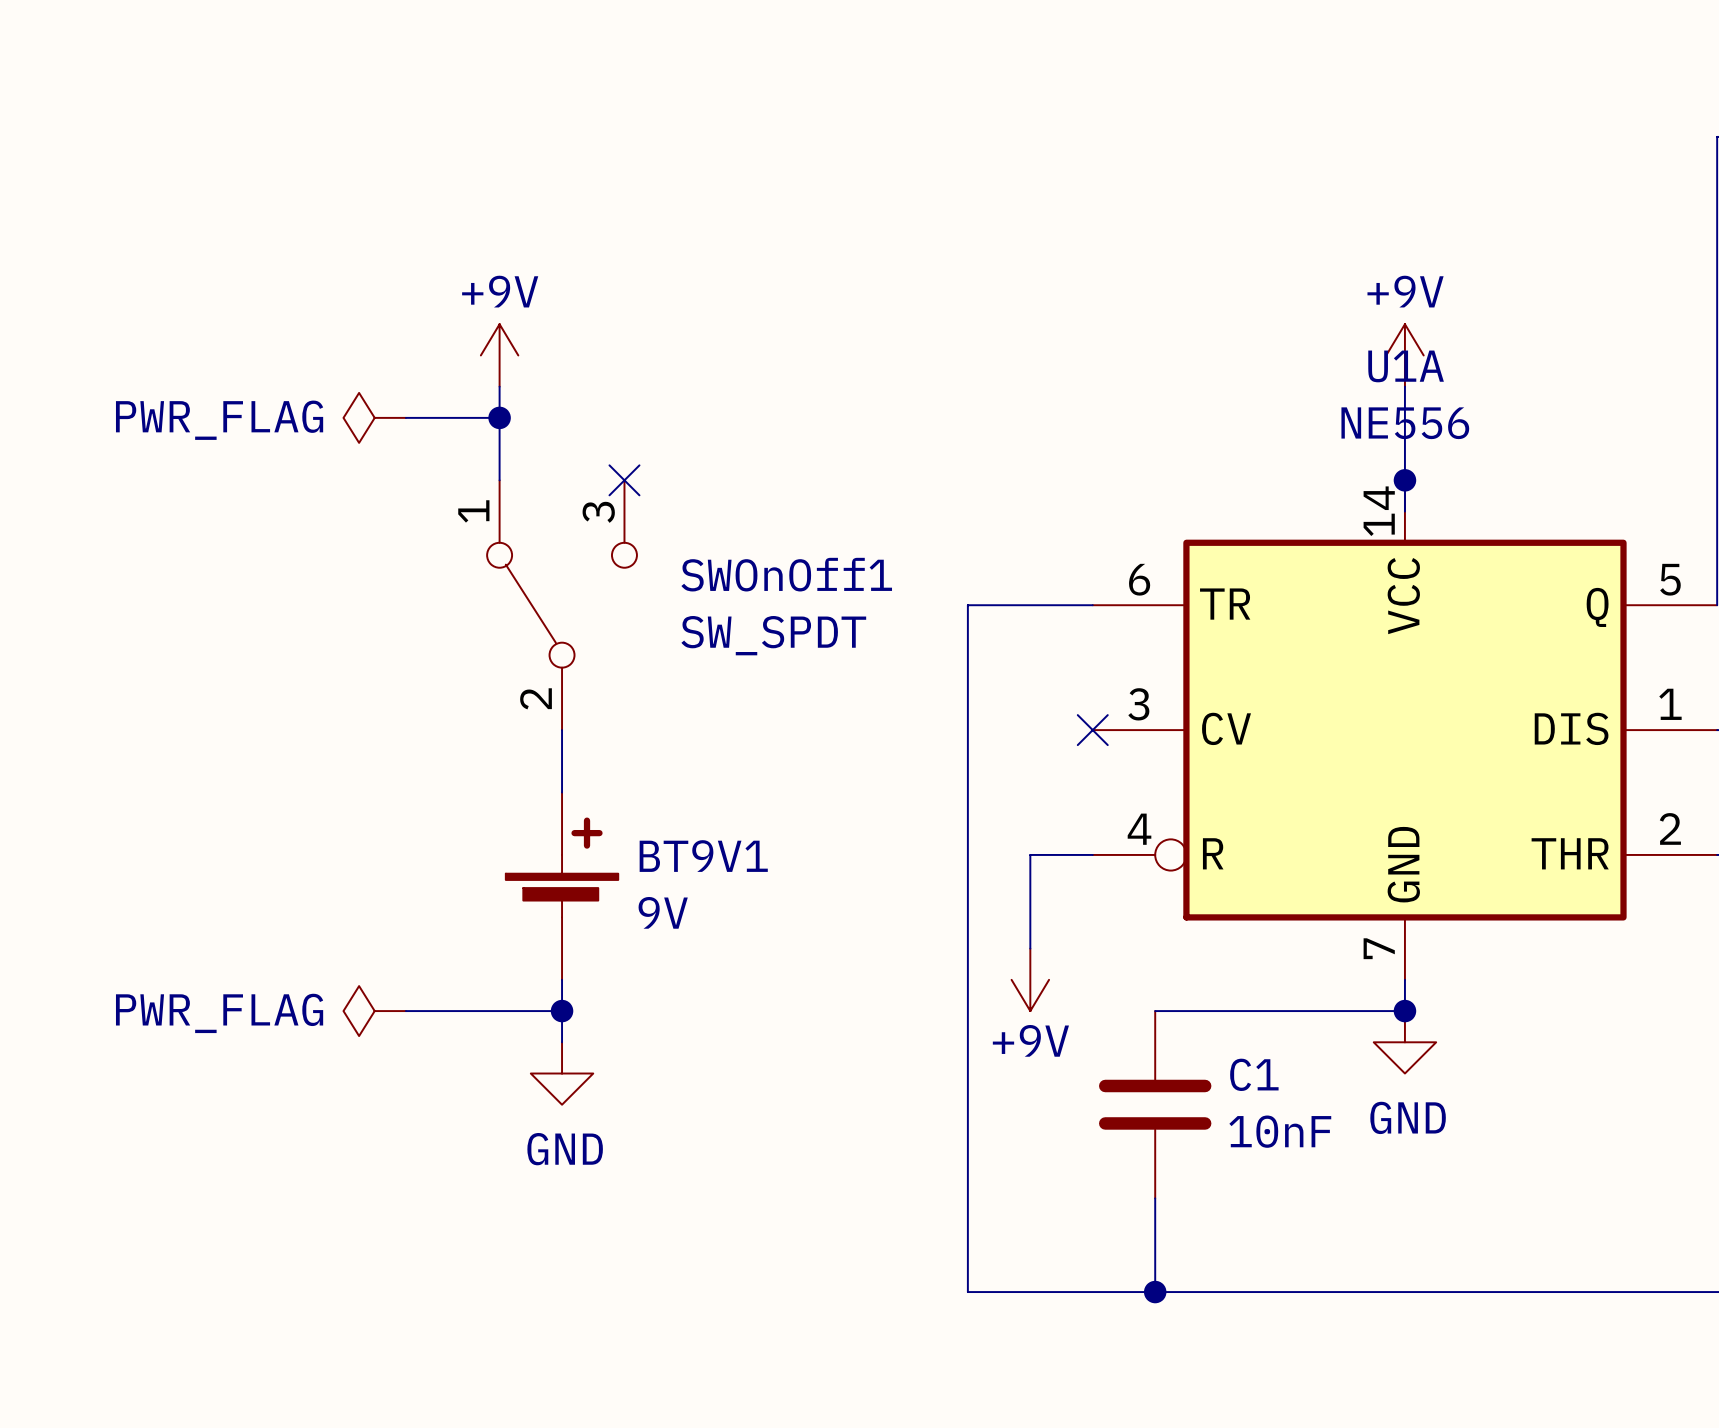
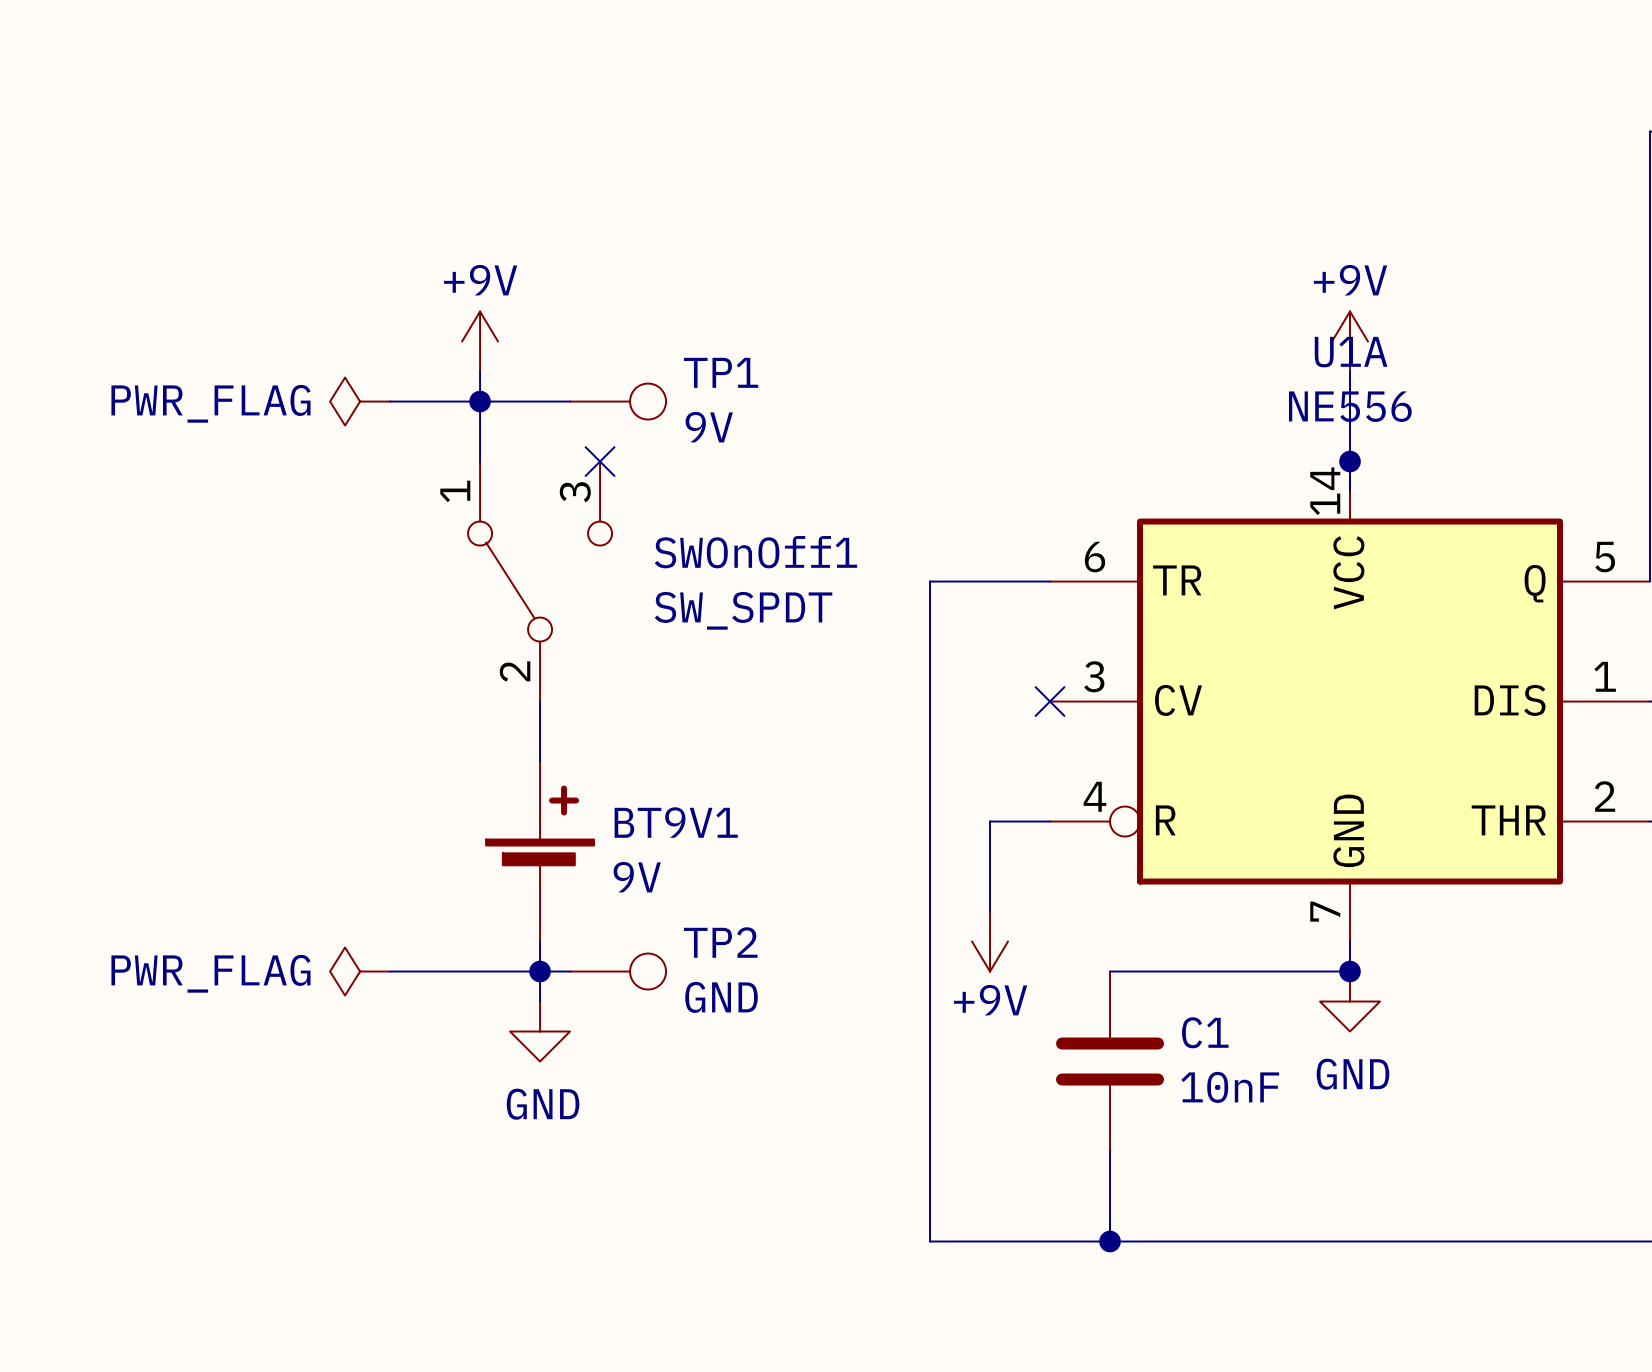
wire: none -> (480, 401) (570, 401)
TP1: none -> 9V (618, 401)
wire: none -> (540, 971) (570, 971)
TP2: none -> GND (618, 971)

